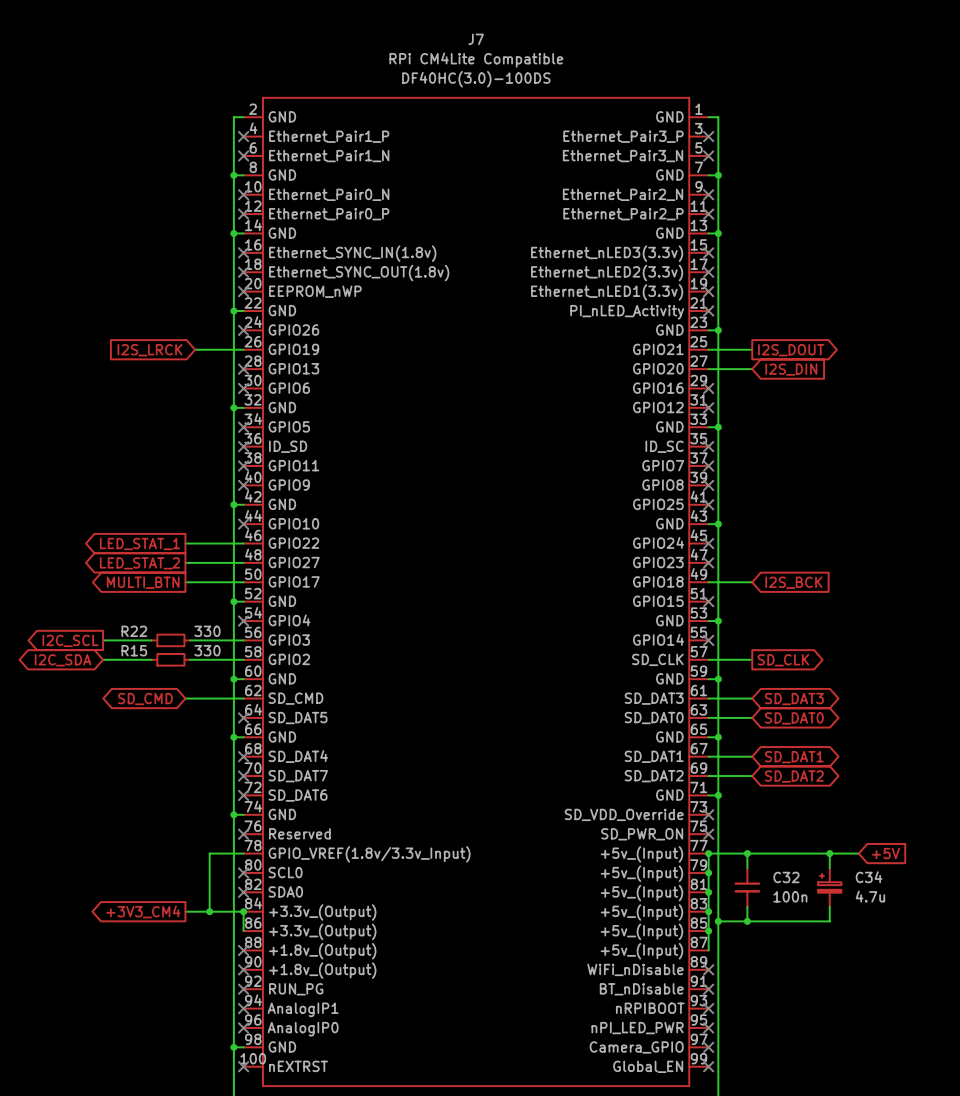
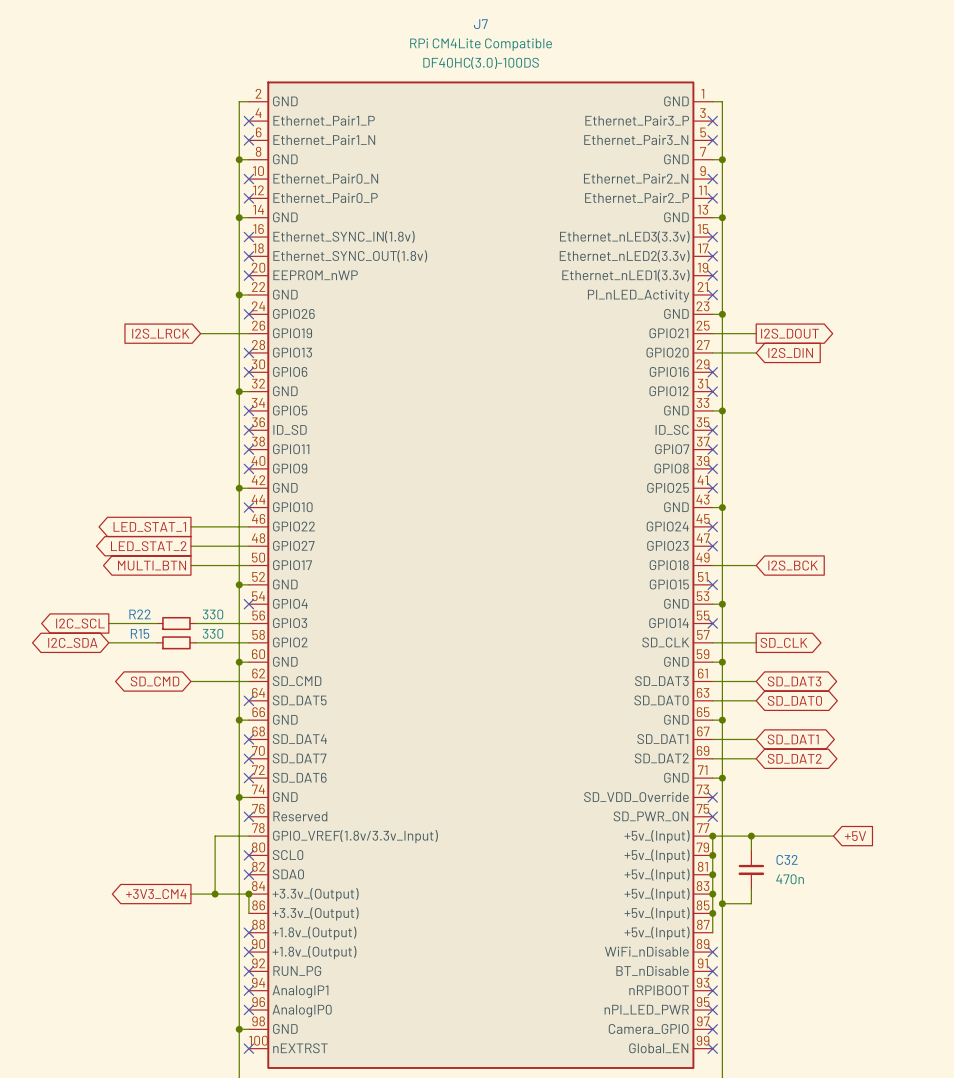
junction: (829, 853) -> none
wire: (858, 853) (829, 853) (829, 868) -> none
global label position: +5V (885, 853) -> +5V (855, 836)
C34: 4.7u (829, 887) -> none
C32 value: 100n (790, 896) -> 470n (790, 879)
wire: (829, 906) (829, 921) (747, 921) -> none
junction: (747, 921) -> none

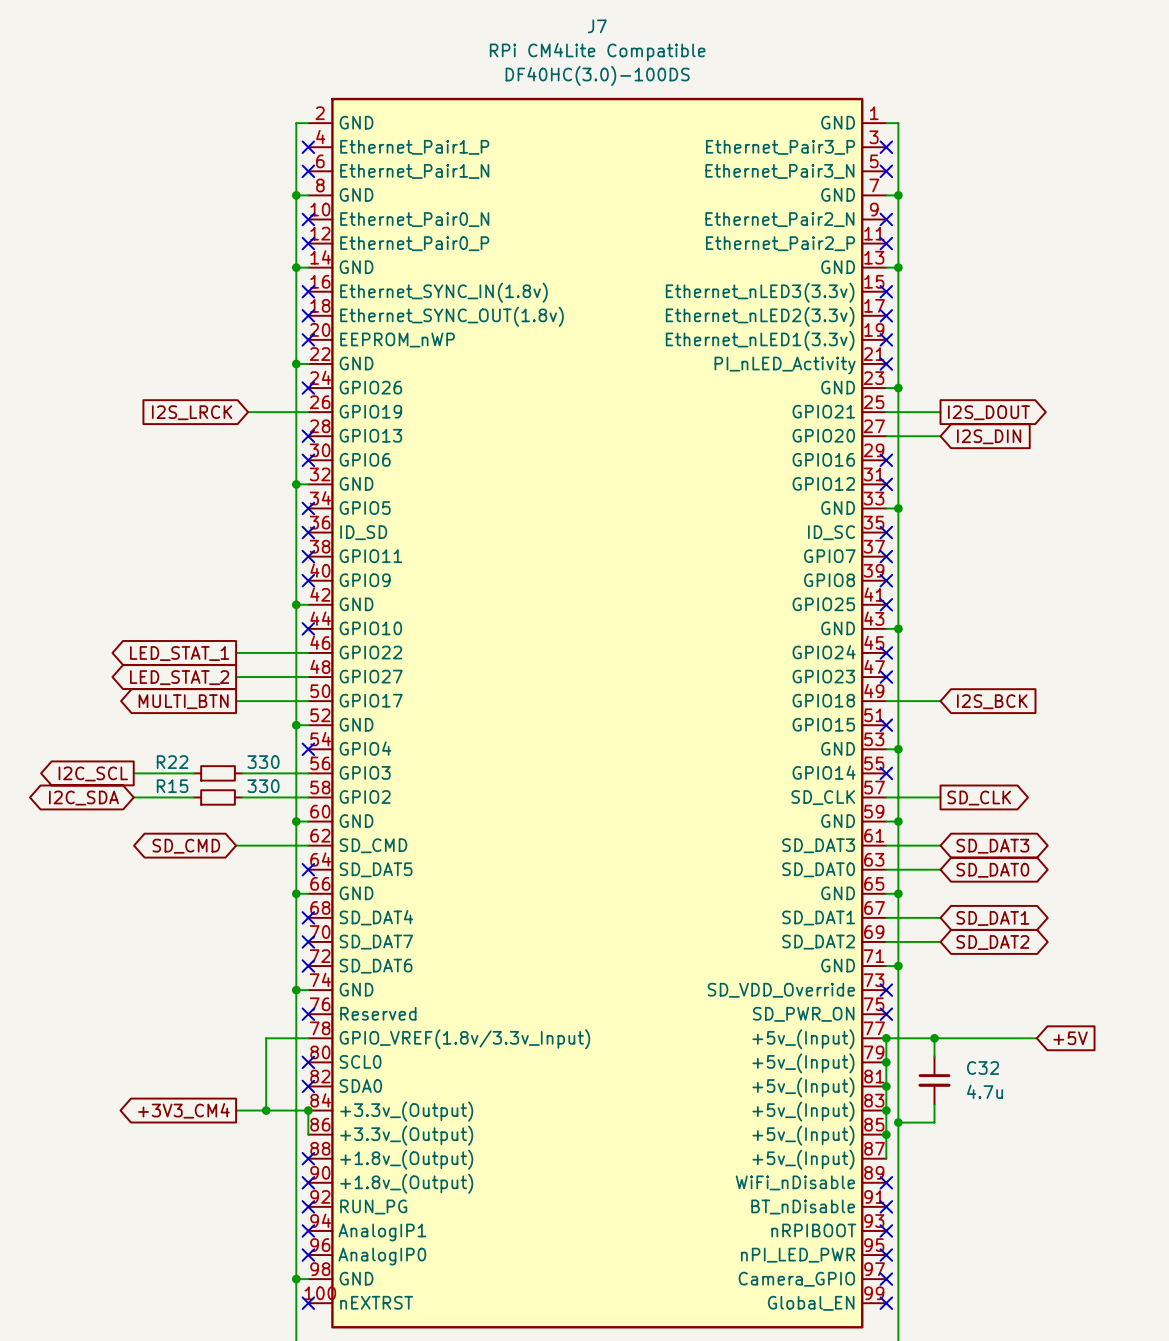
C32 value: 470n (790, 879) -> 4.7u (985, 1091)

